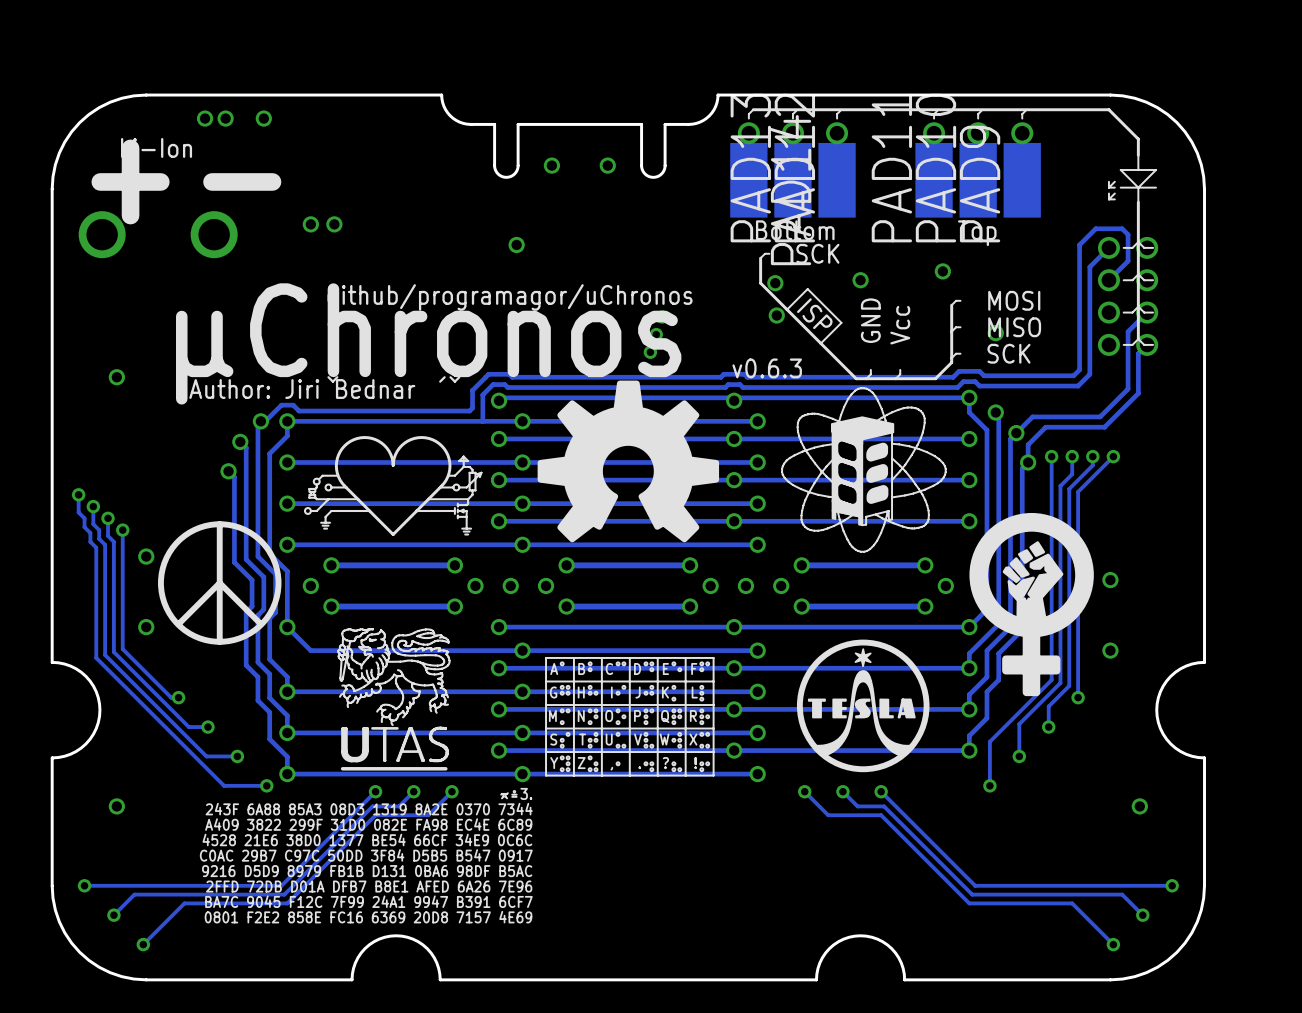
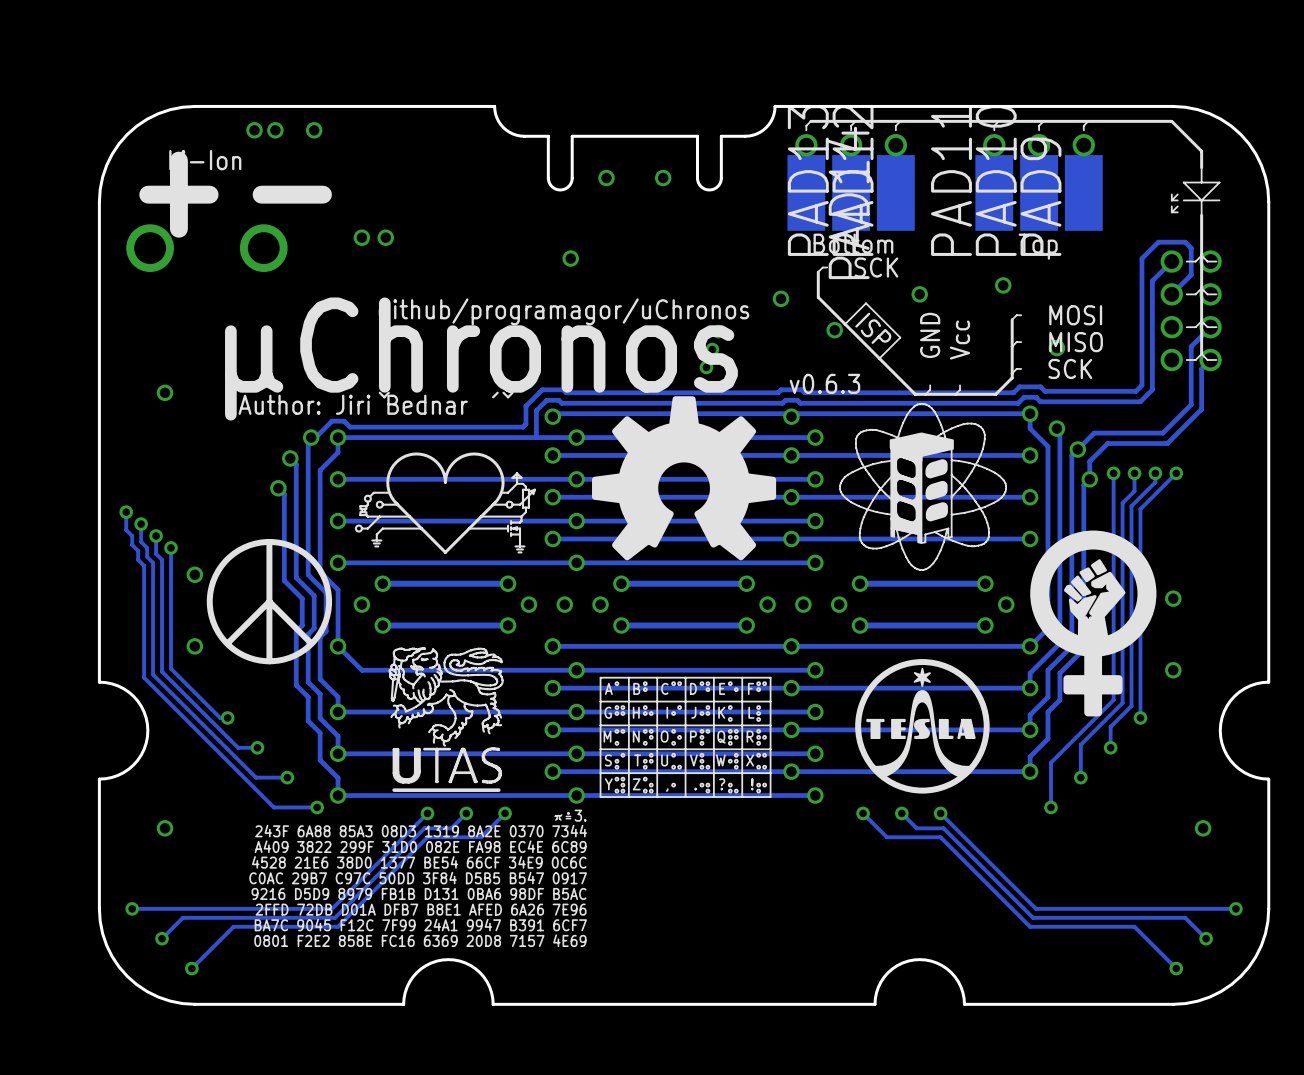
via position: (775, 283) -> (781, 298)

